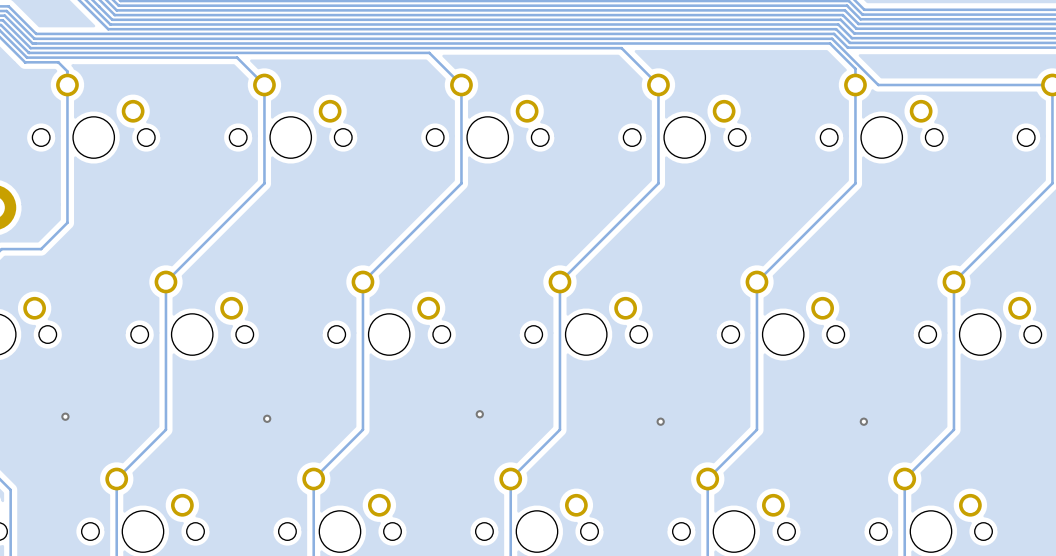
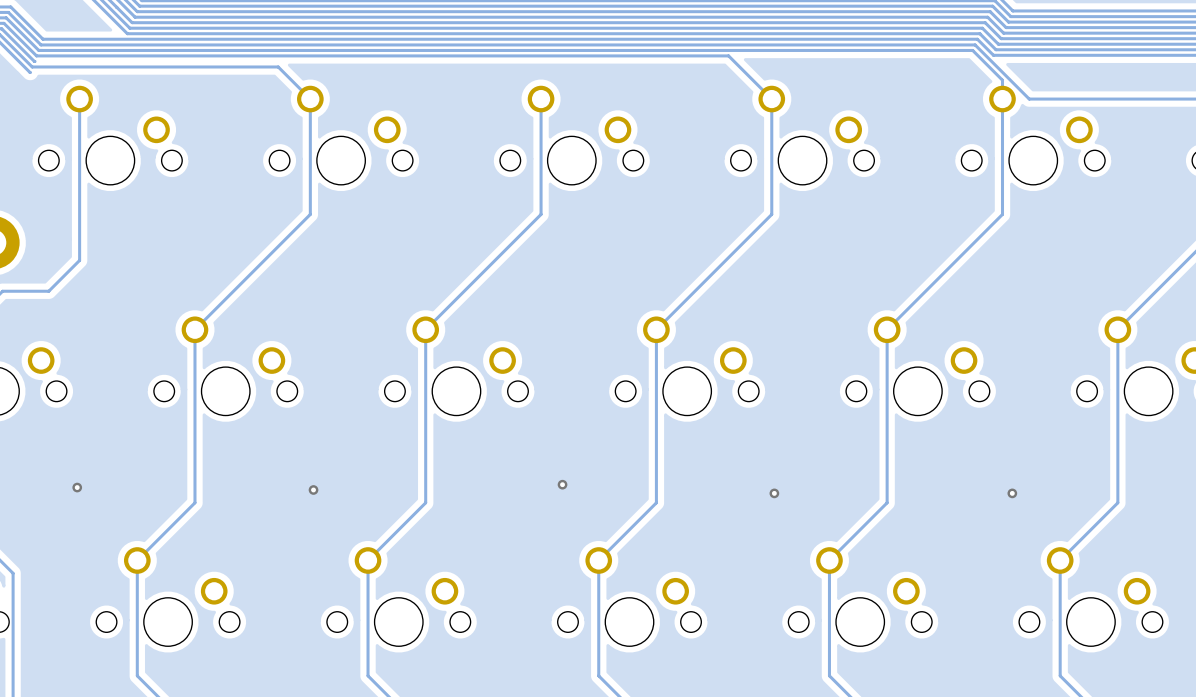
track: (29, 52) (429, 52) (461, 85) -> none
track: (25, 62) (58, 62) (67, 71) (67, 85) -> none

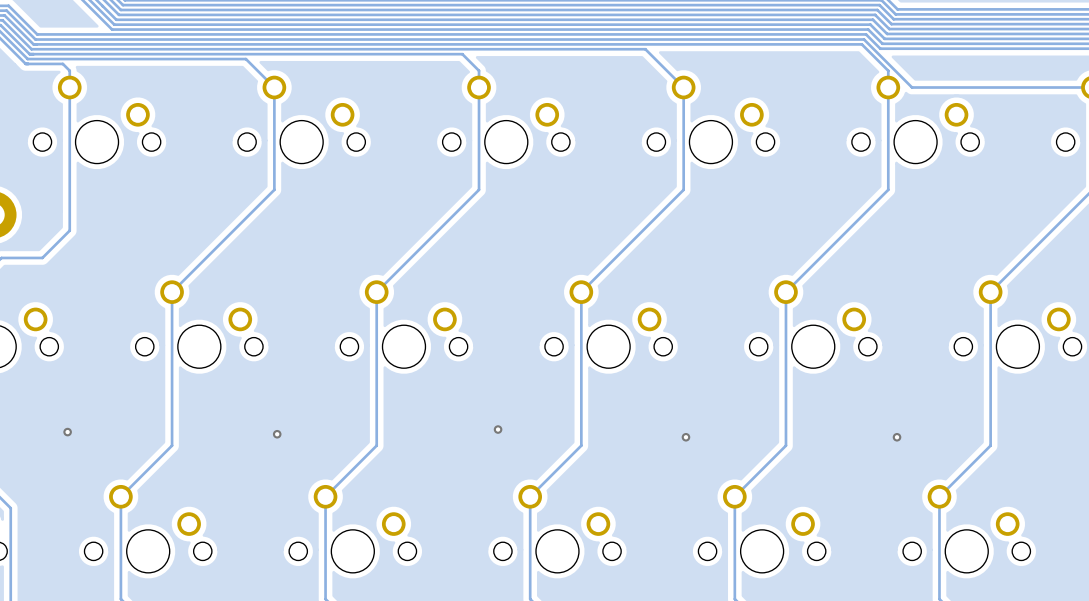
track: none -> (30, 54) (462, 54) (479, 70) (479, 87)
track: none -> (26, 63) (62, 63) (69, 70) (69, 87)

